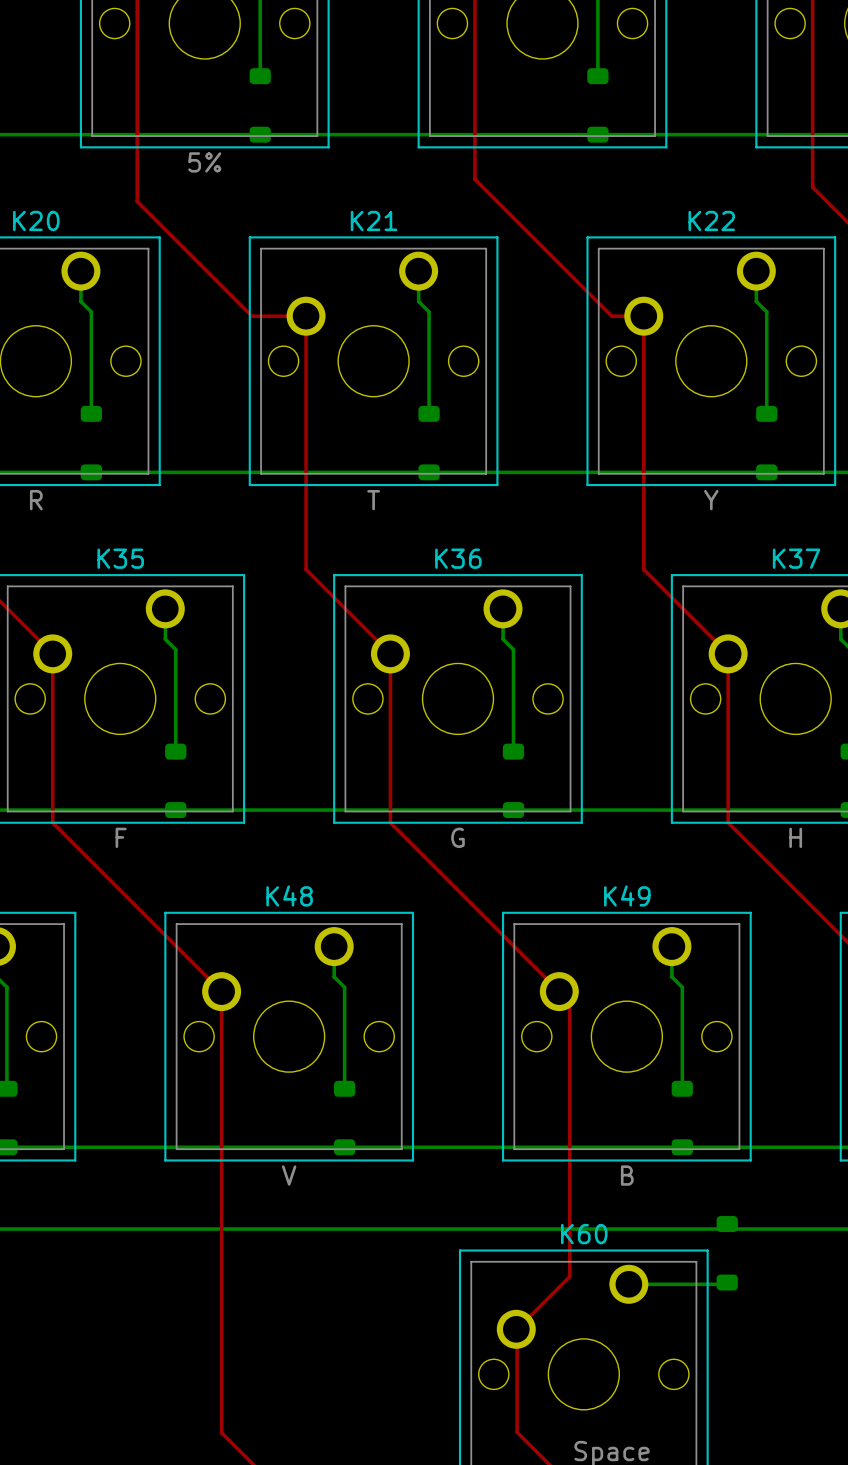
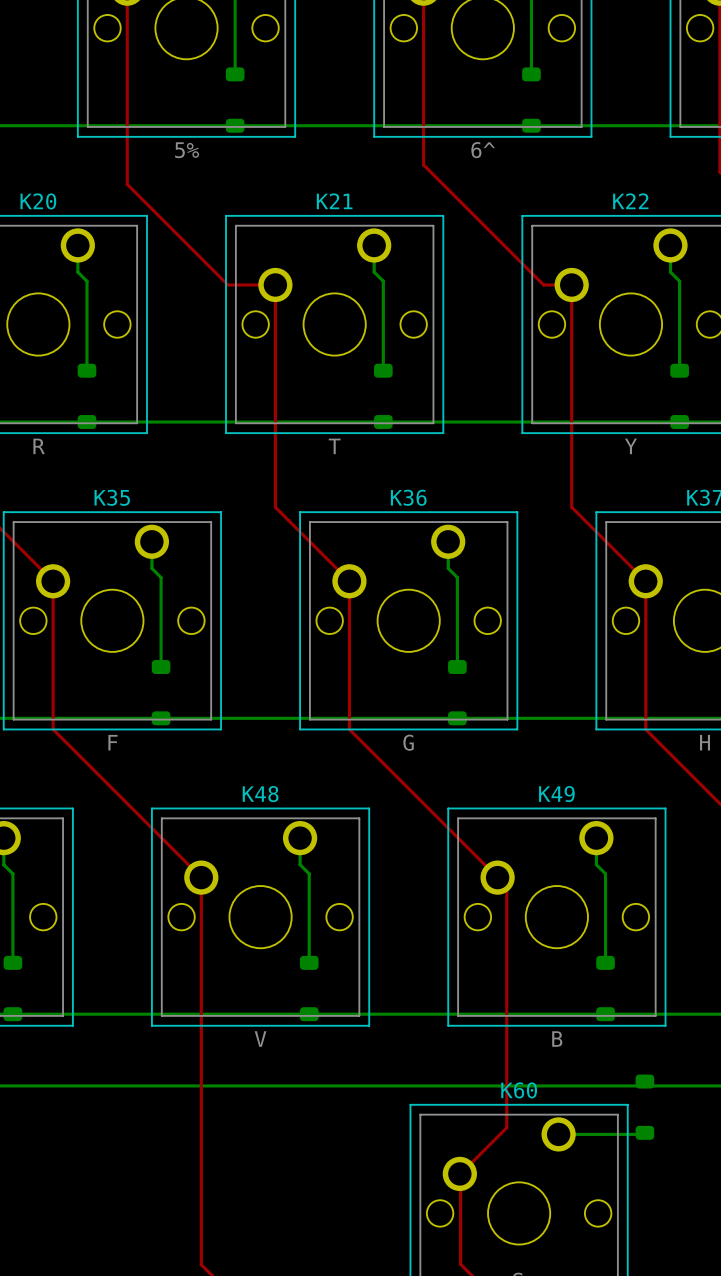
part value: none -> 6^ (483, 150)

